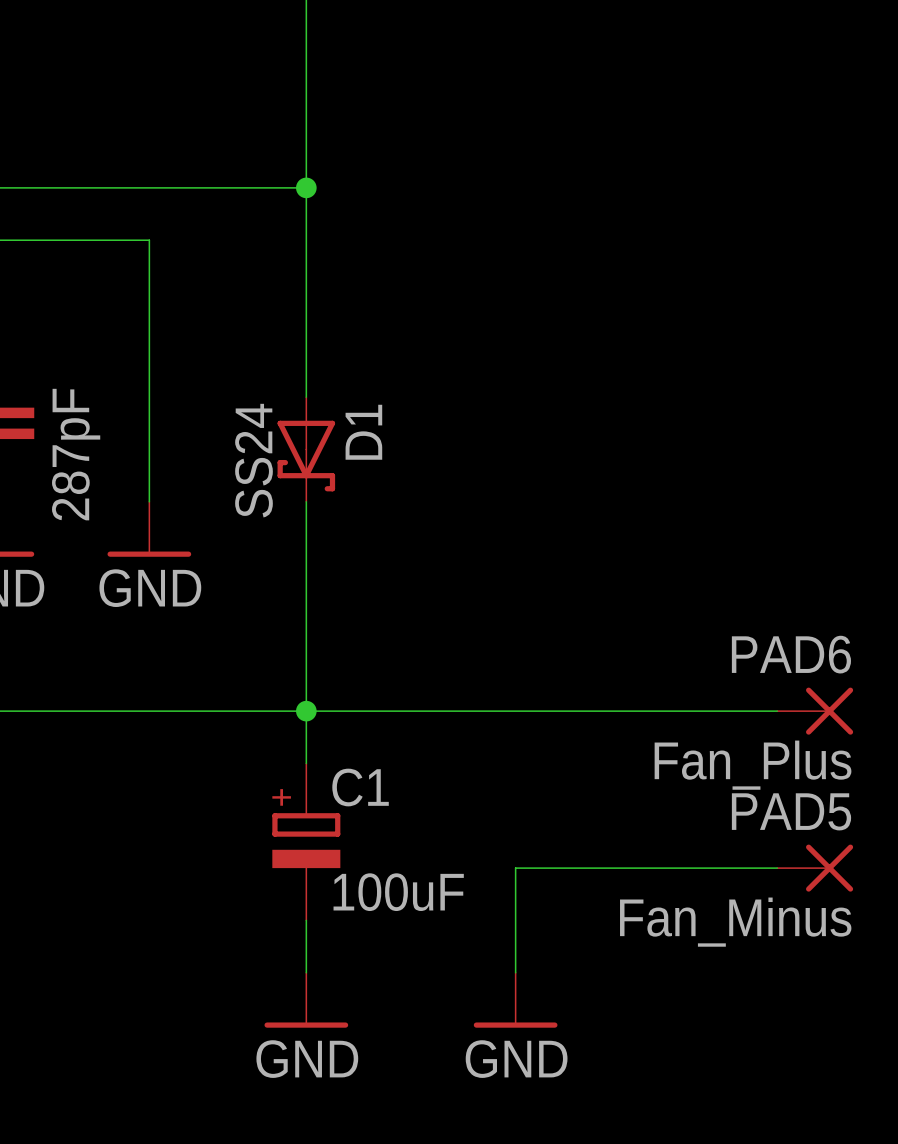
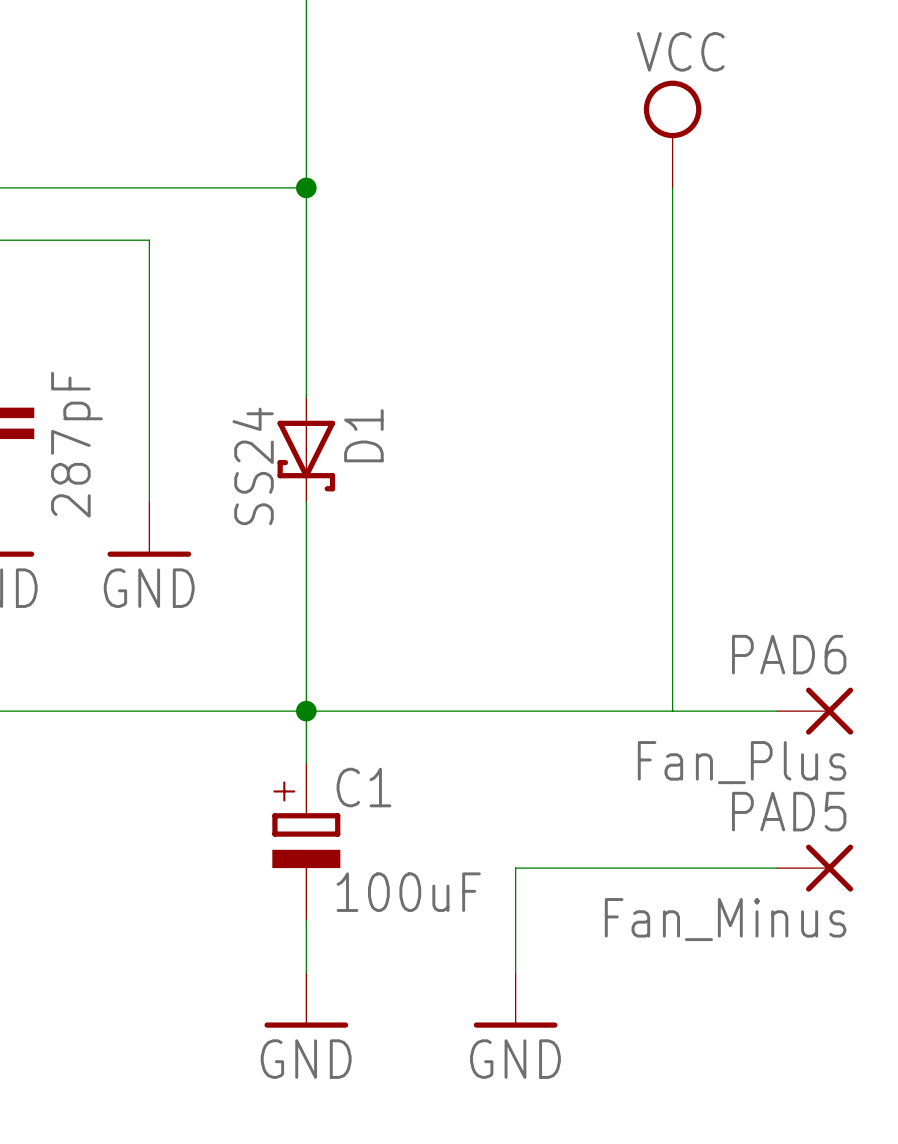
power symbol: none -> VCC (672, 134)
wire: none -> (672, 187) (672, 711)

